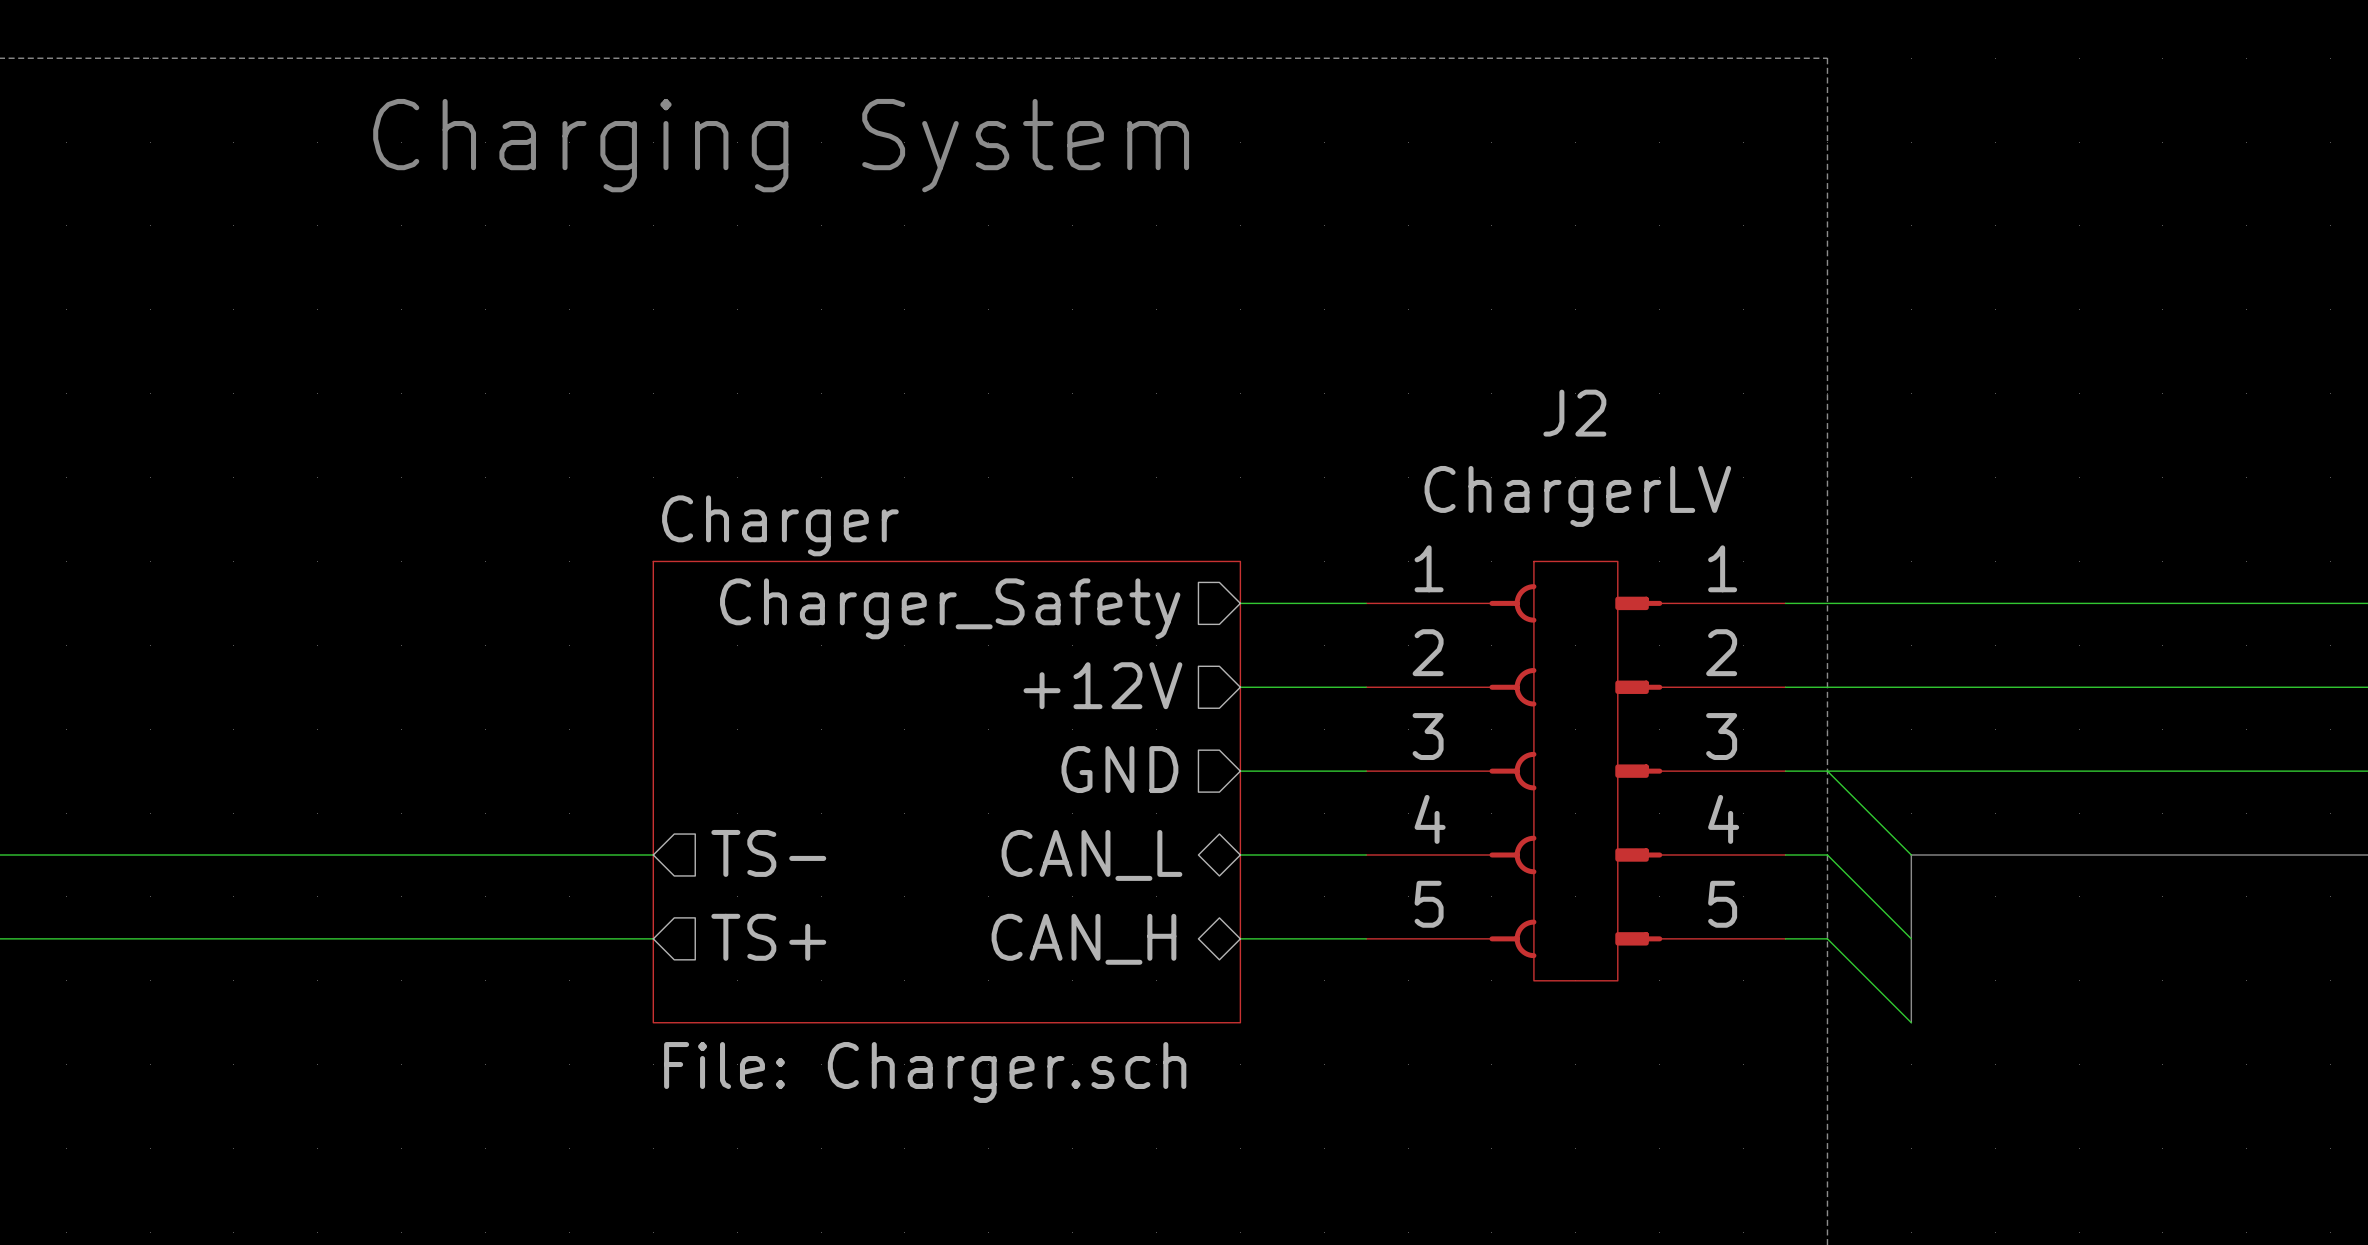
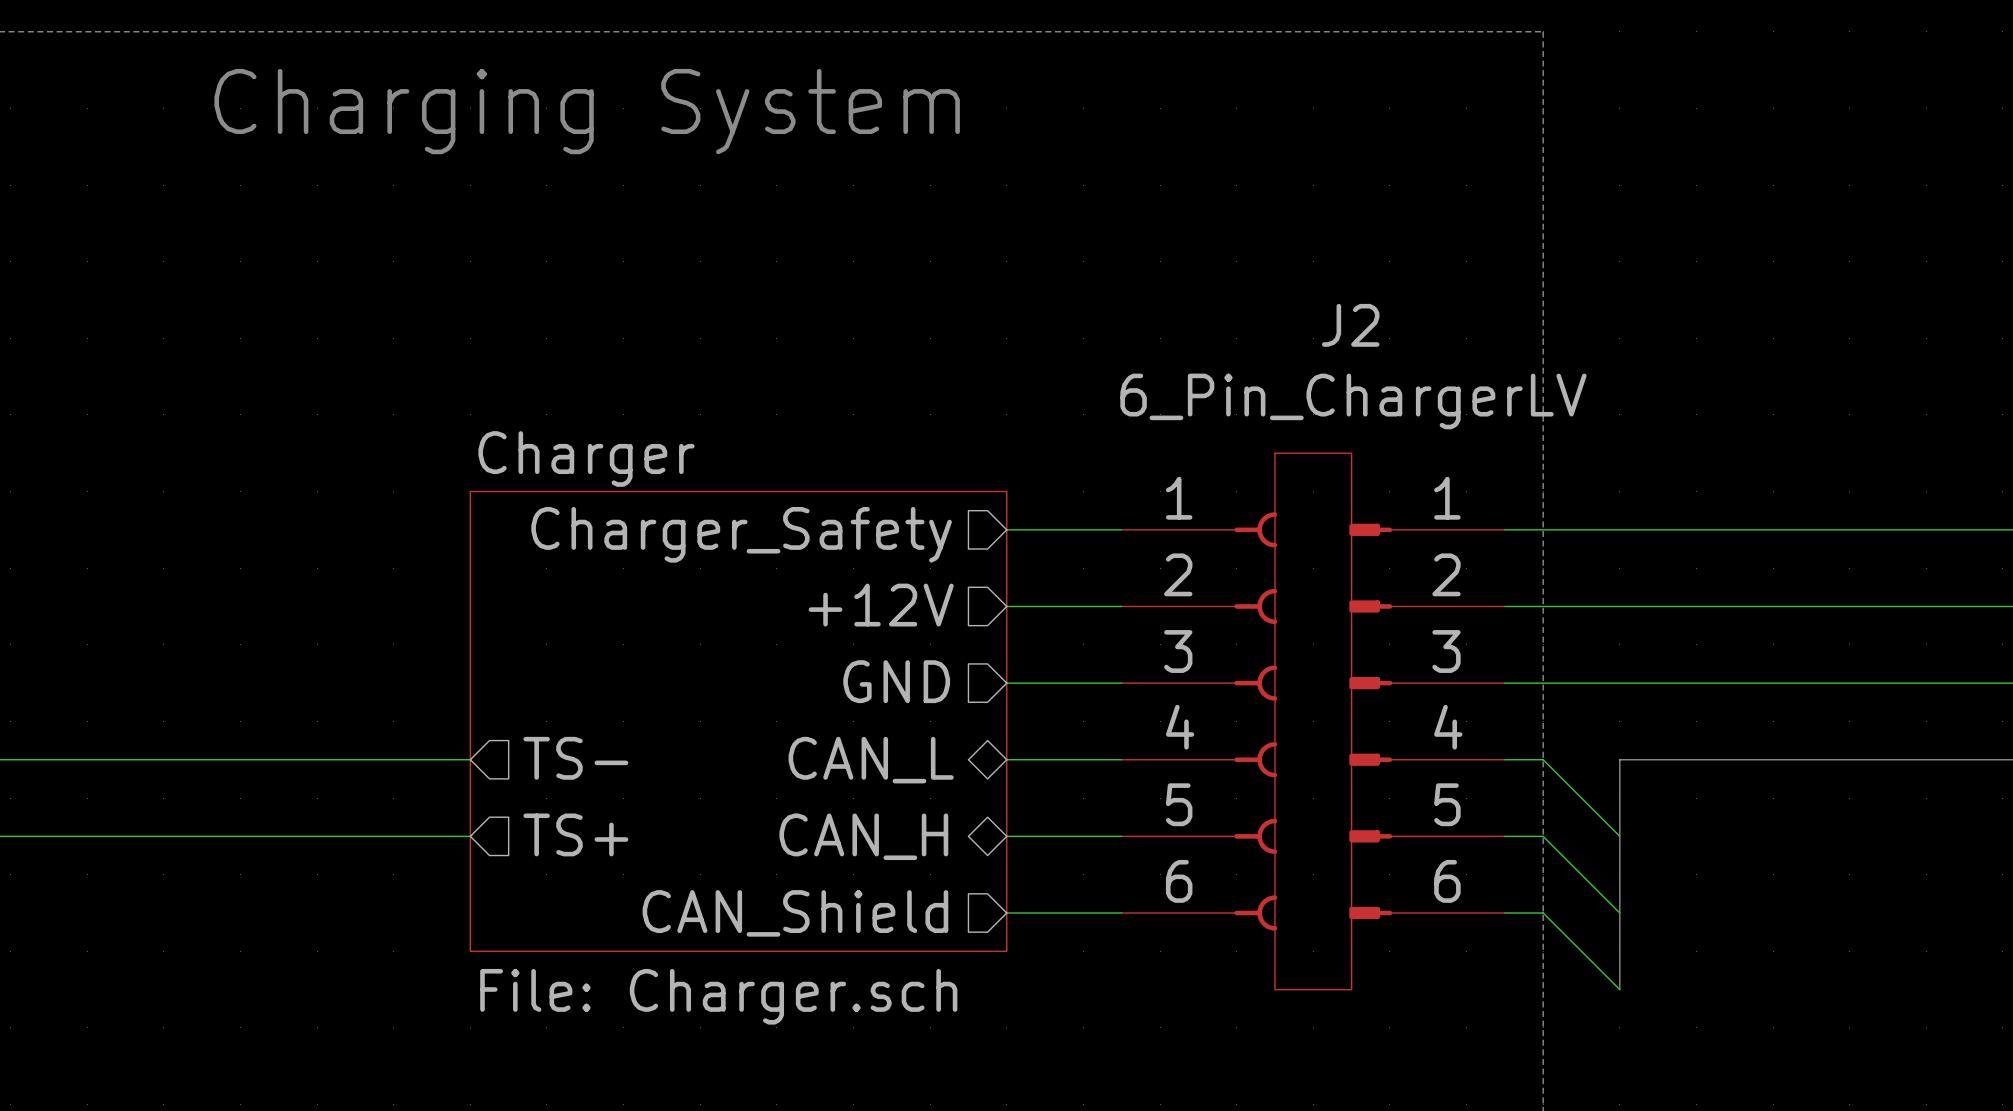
J2 name position: J2 (1574, 413) -> J2 (1350, 325)
J2 value: ChargerLV (1577, 496) -> 6_Pin_ChargerLV (1353, 401)
sheet Charger shape: [653, 561, 1241, 1023] -> [470, 491, 1007, 952]
J2 symbol: [1366, 561, 1786, 981] -> [1121, 453, 1505, 990]
wire: (1827, 771) (1911, 855) -> none
wire: none -> (1006, 913) (1121, 913)
wire: none -> (1504, 913) (1543, 913) (1619, 989)
bus: none -> (1619, 913) (1619, 989)
hierarchical label: none -> CAN_Shield (795, 913)

